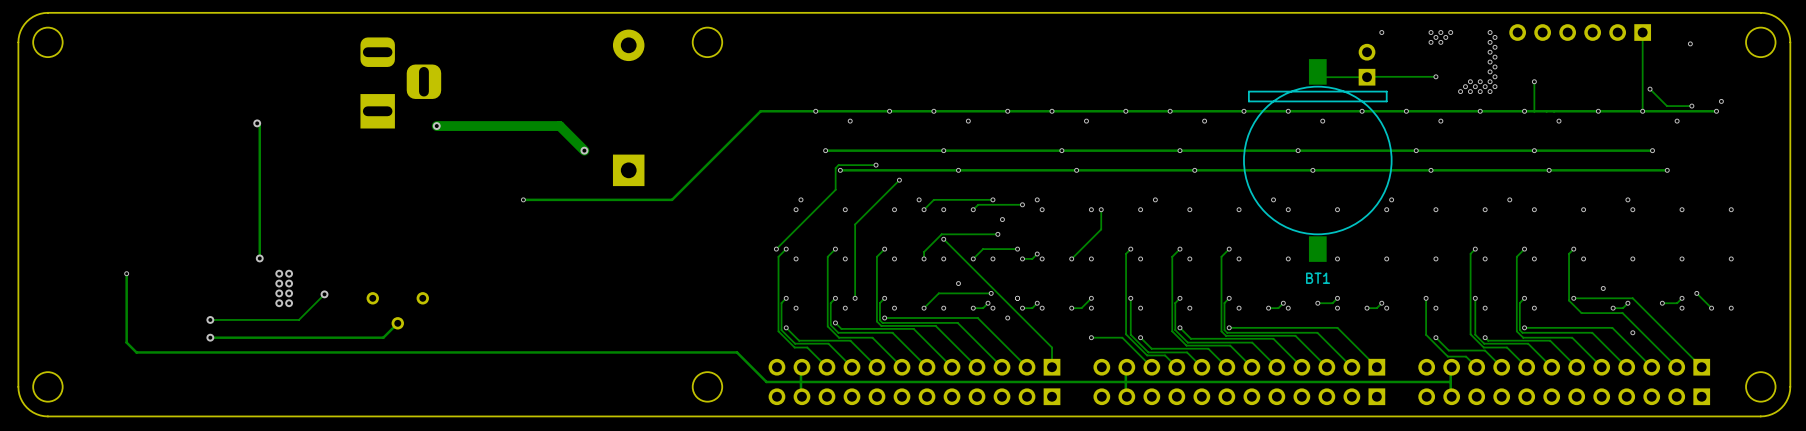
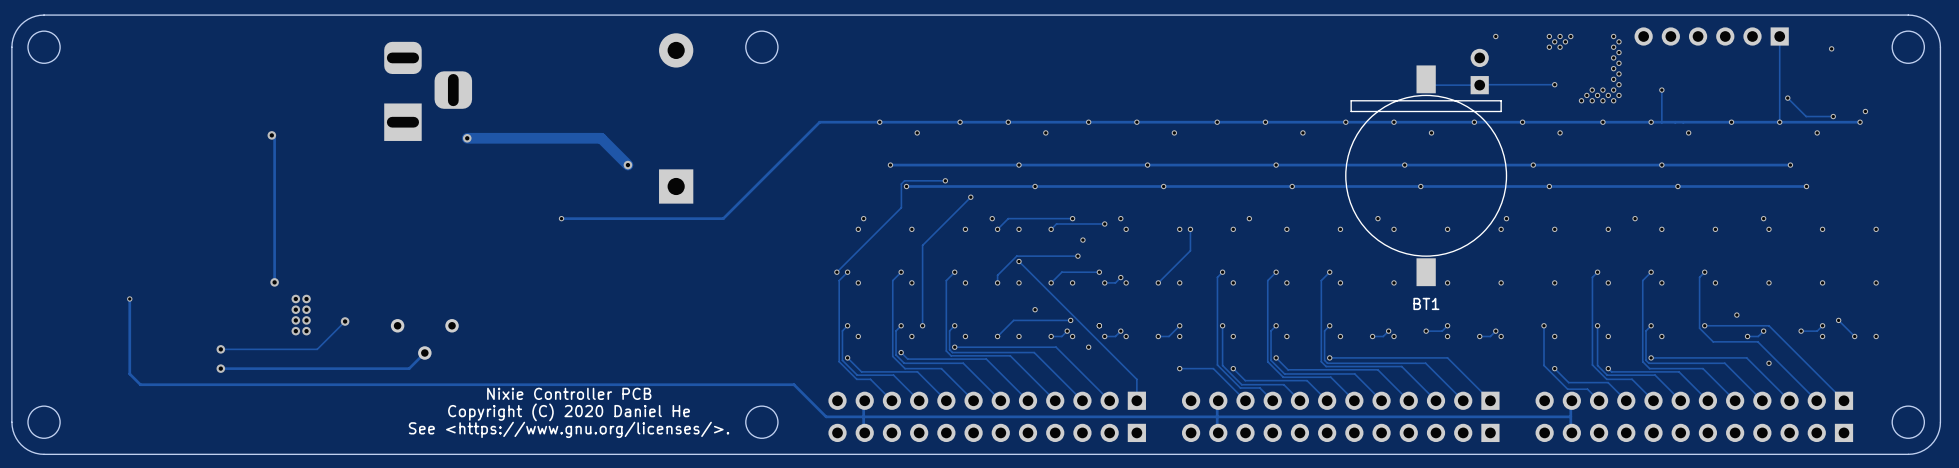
text: none -> Nixie Controller PCB (569, 393)
text: none -> Copyright (C) 2020 Daniel He (569, 412)
text: none -> See <https://www.gnu.org/licenses/>. (569, 429)

